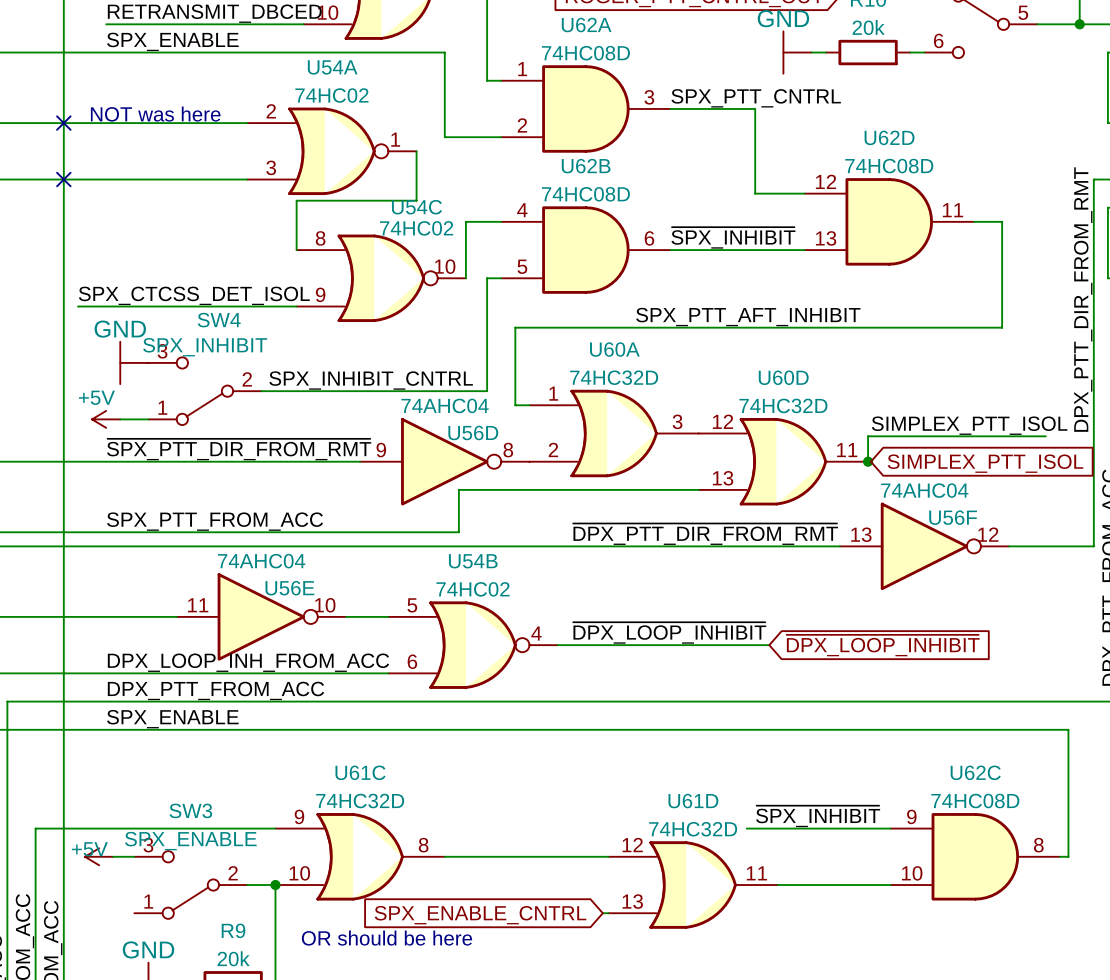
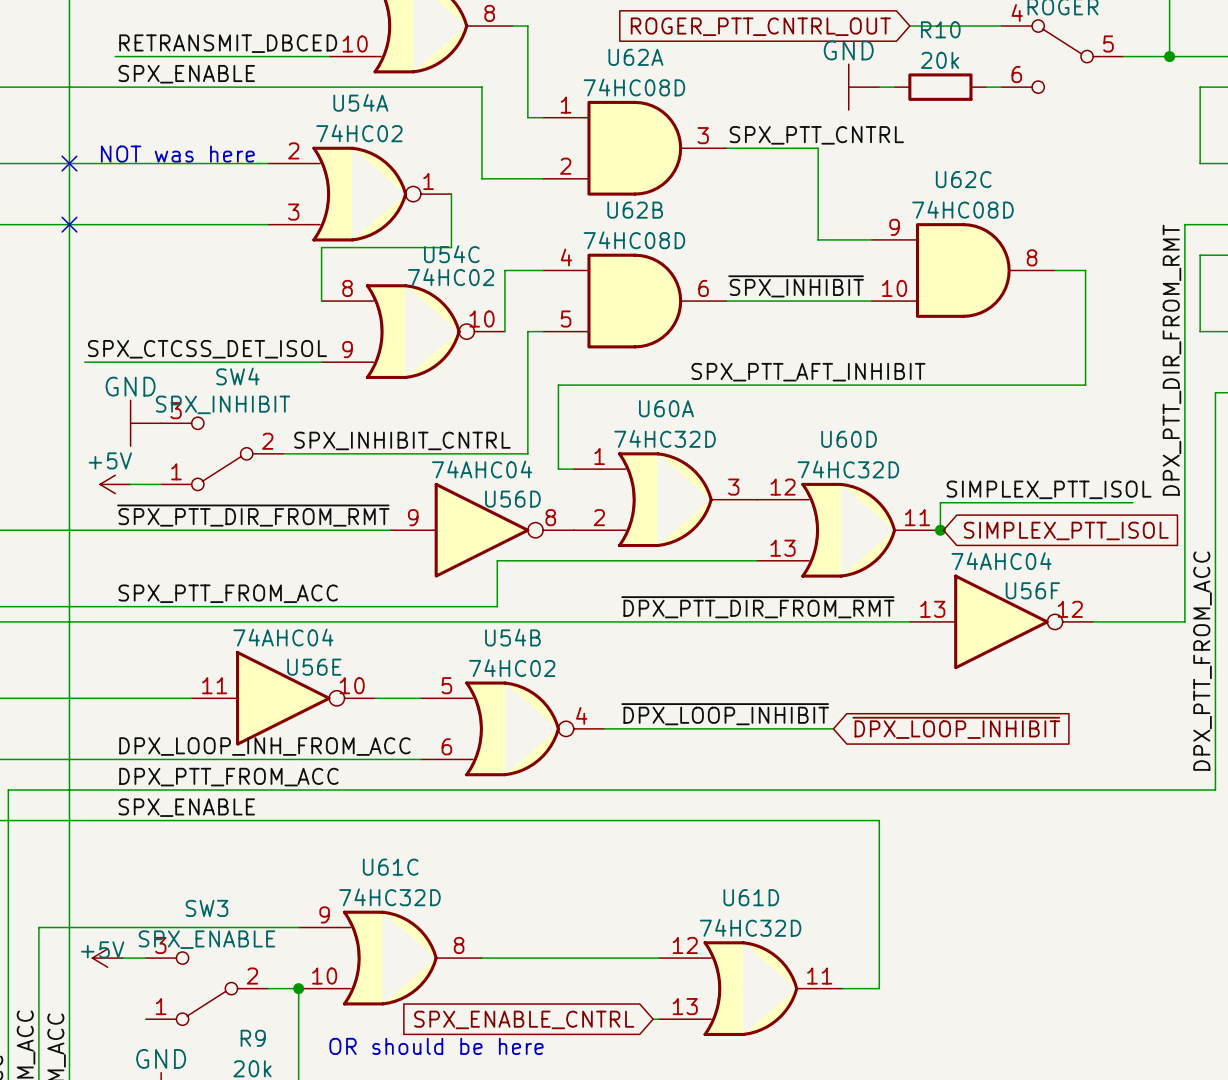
U62D: 74HC08D (889, 221) -> none
wire: (811, 729) (1068, 729) (1068, 856) (1059, 856) -> none
label: ~{SPX_INHIBIT} (818, 816) -> none
wire: (746, 828) (890, 828) -> none
U62C position: (975, 856) -> (963, 270)
wire: (811, 885) (890, 885) -> (879, 988) (879, 820)

